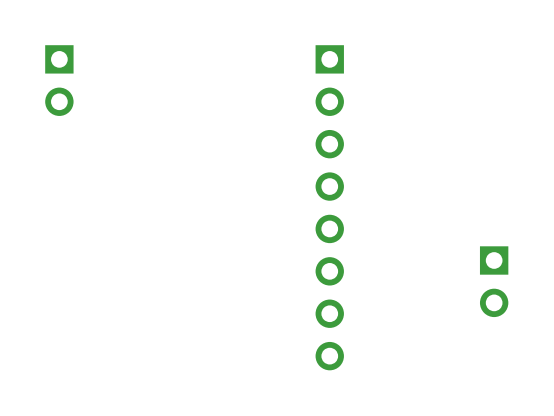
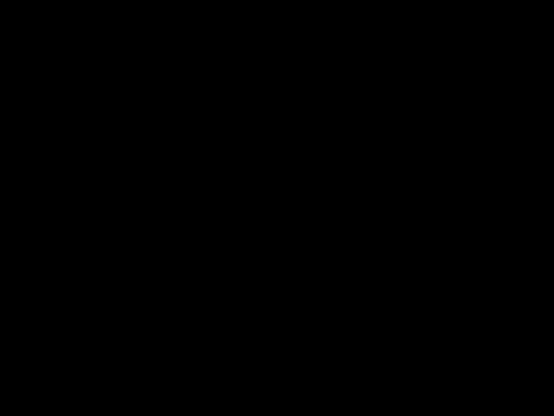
part: (59, 80) -> none
part: (329, 207) -> none
part: (494, 281) -> none

